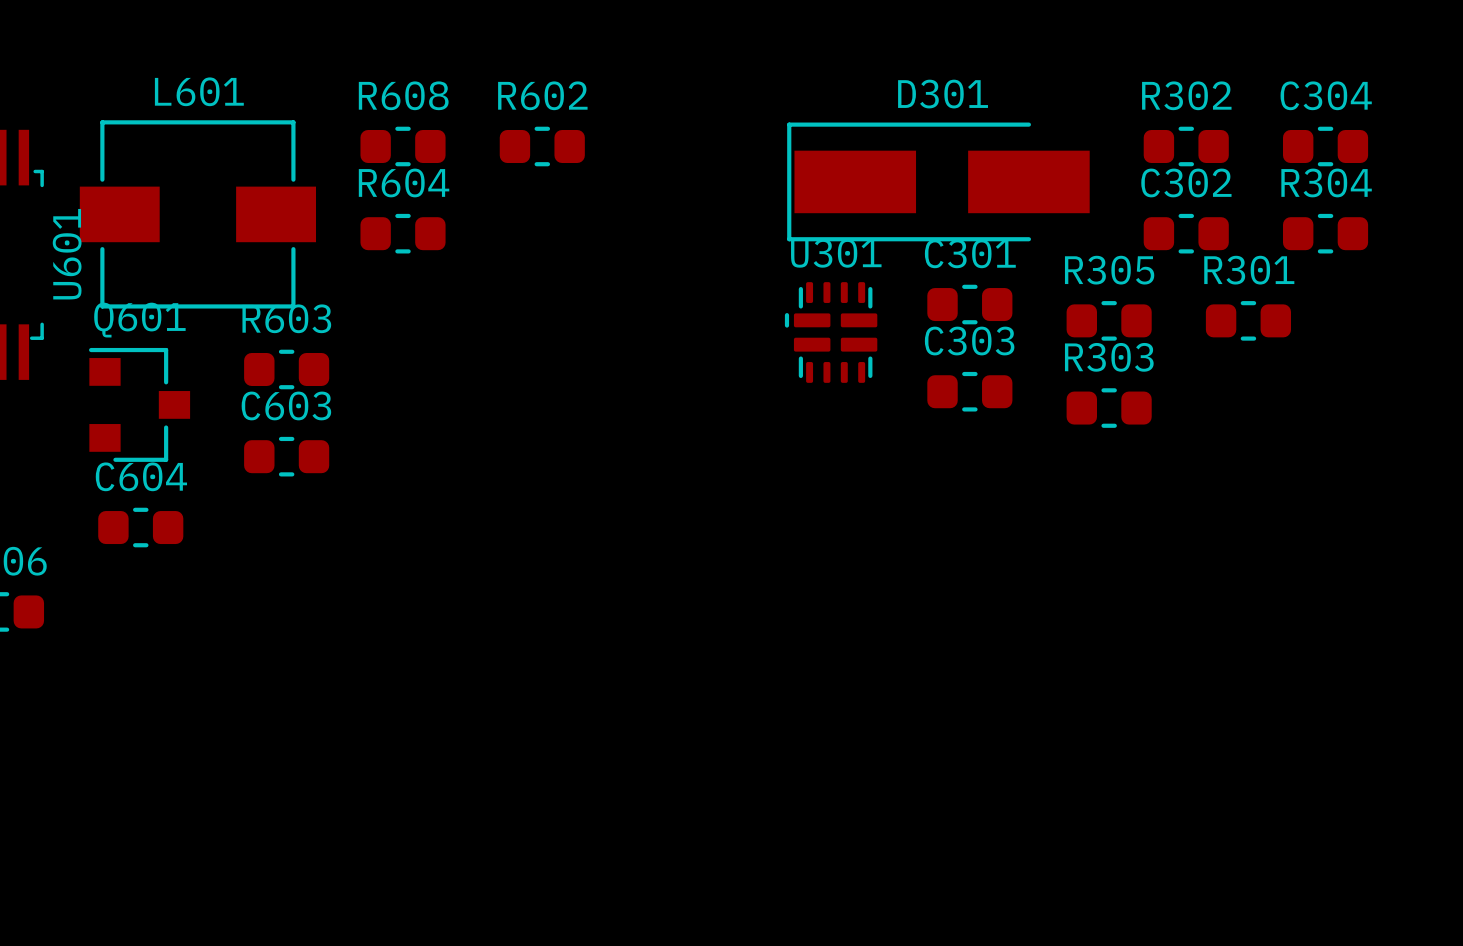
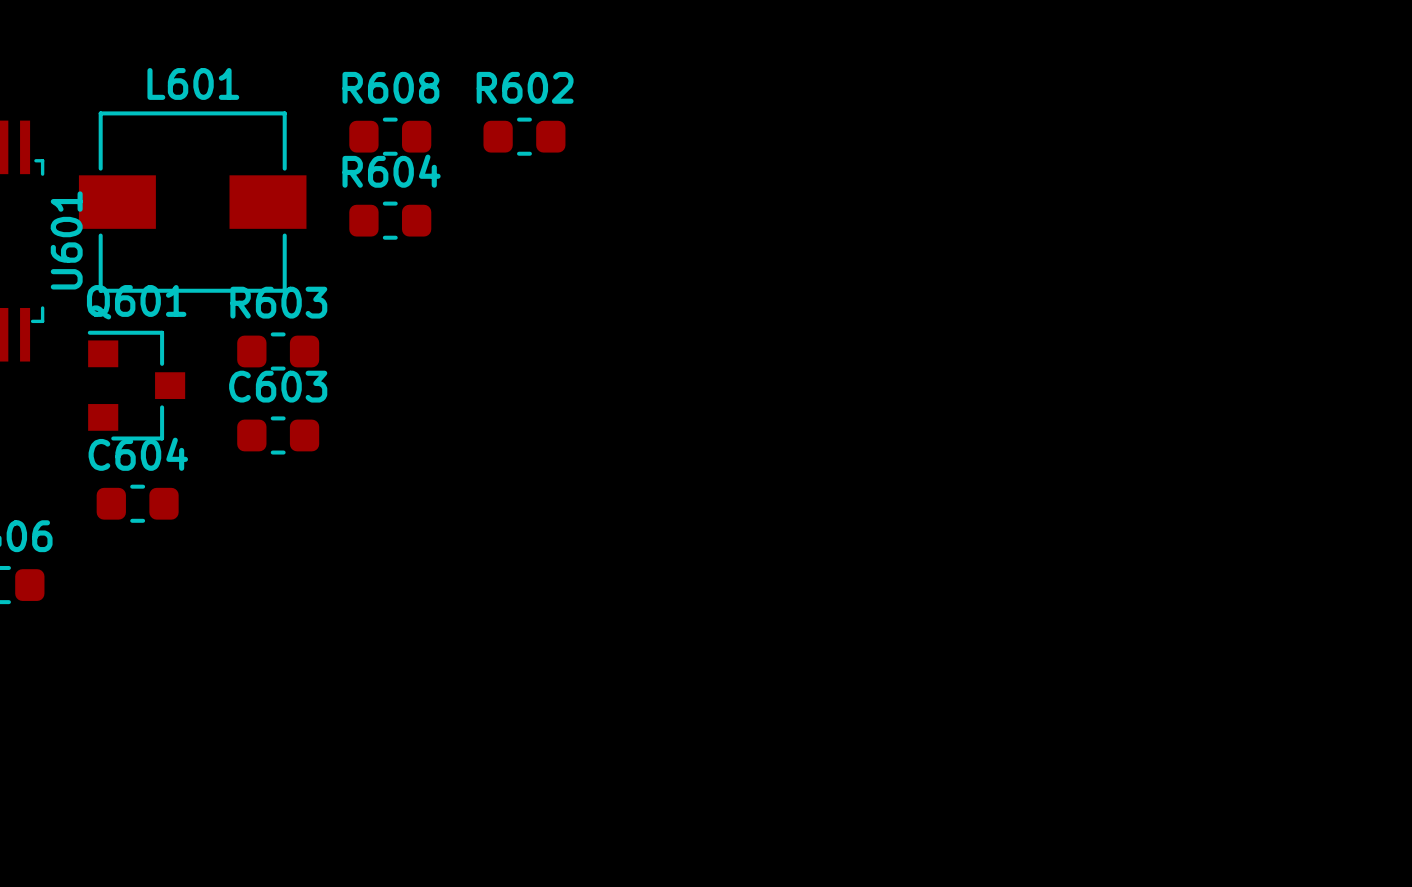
R302: (1186, 146) -> none
C304: (1325, 146) -> none
D301: (938, 181) -> none
C302: (1186, 233) -> none
R304: (1325, 233) -> none
C301: (969, 304) -> none
R305: (1109, 320) -> none
R301: (1248, 320) -> none
U301: (831, 332) -> none
C303: (969, 391) -> none
R303: (1109, 408) -> none

